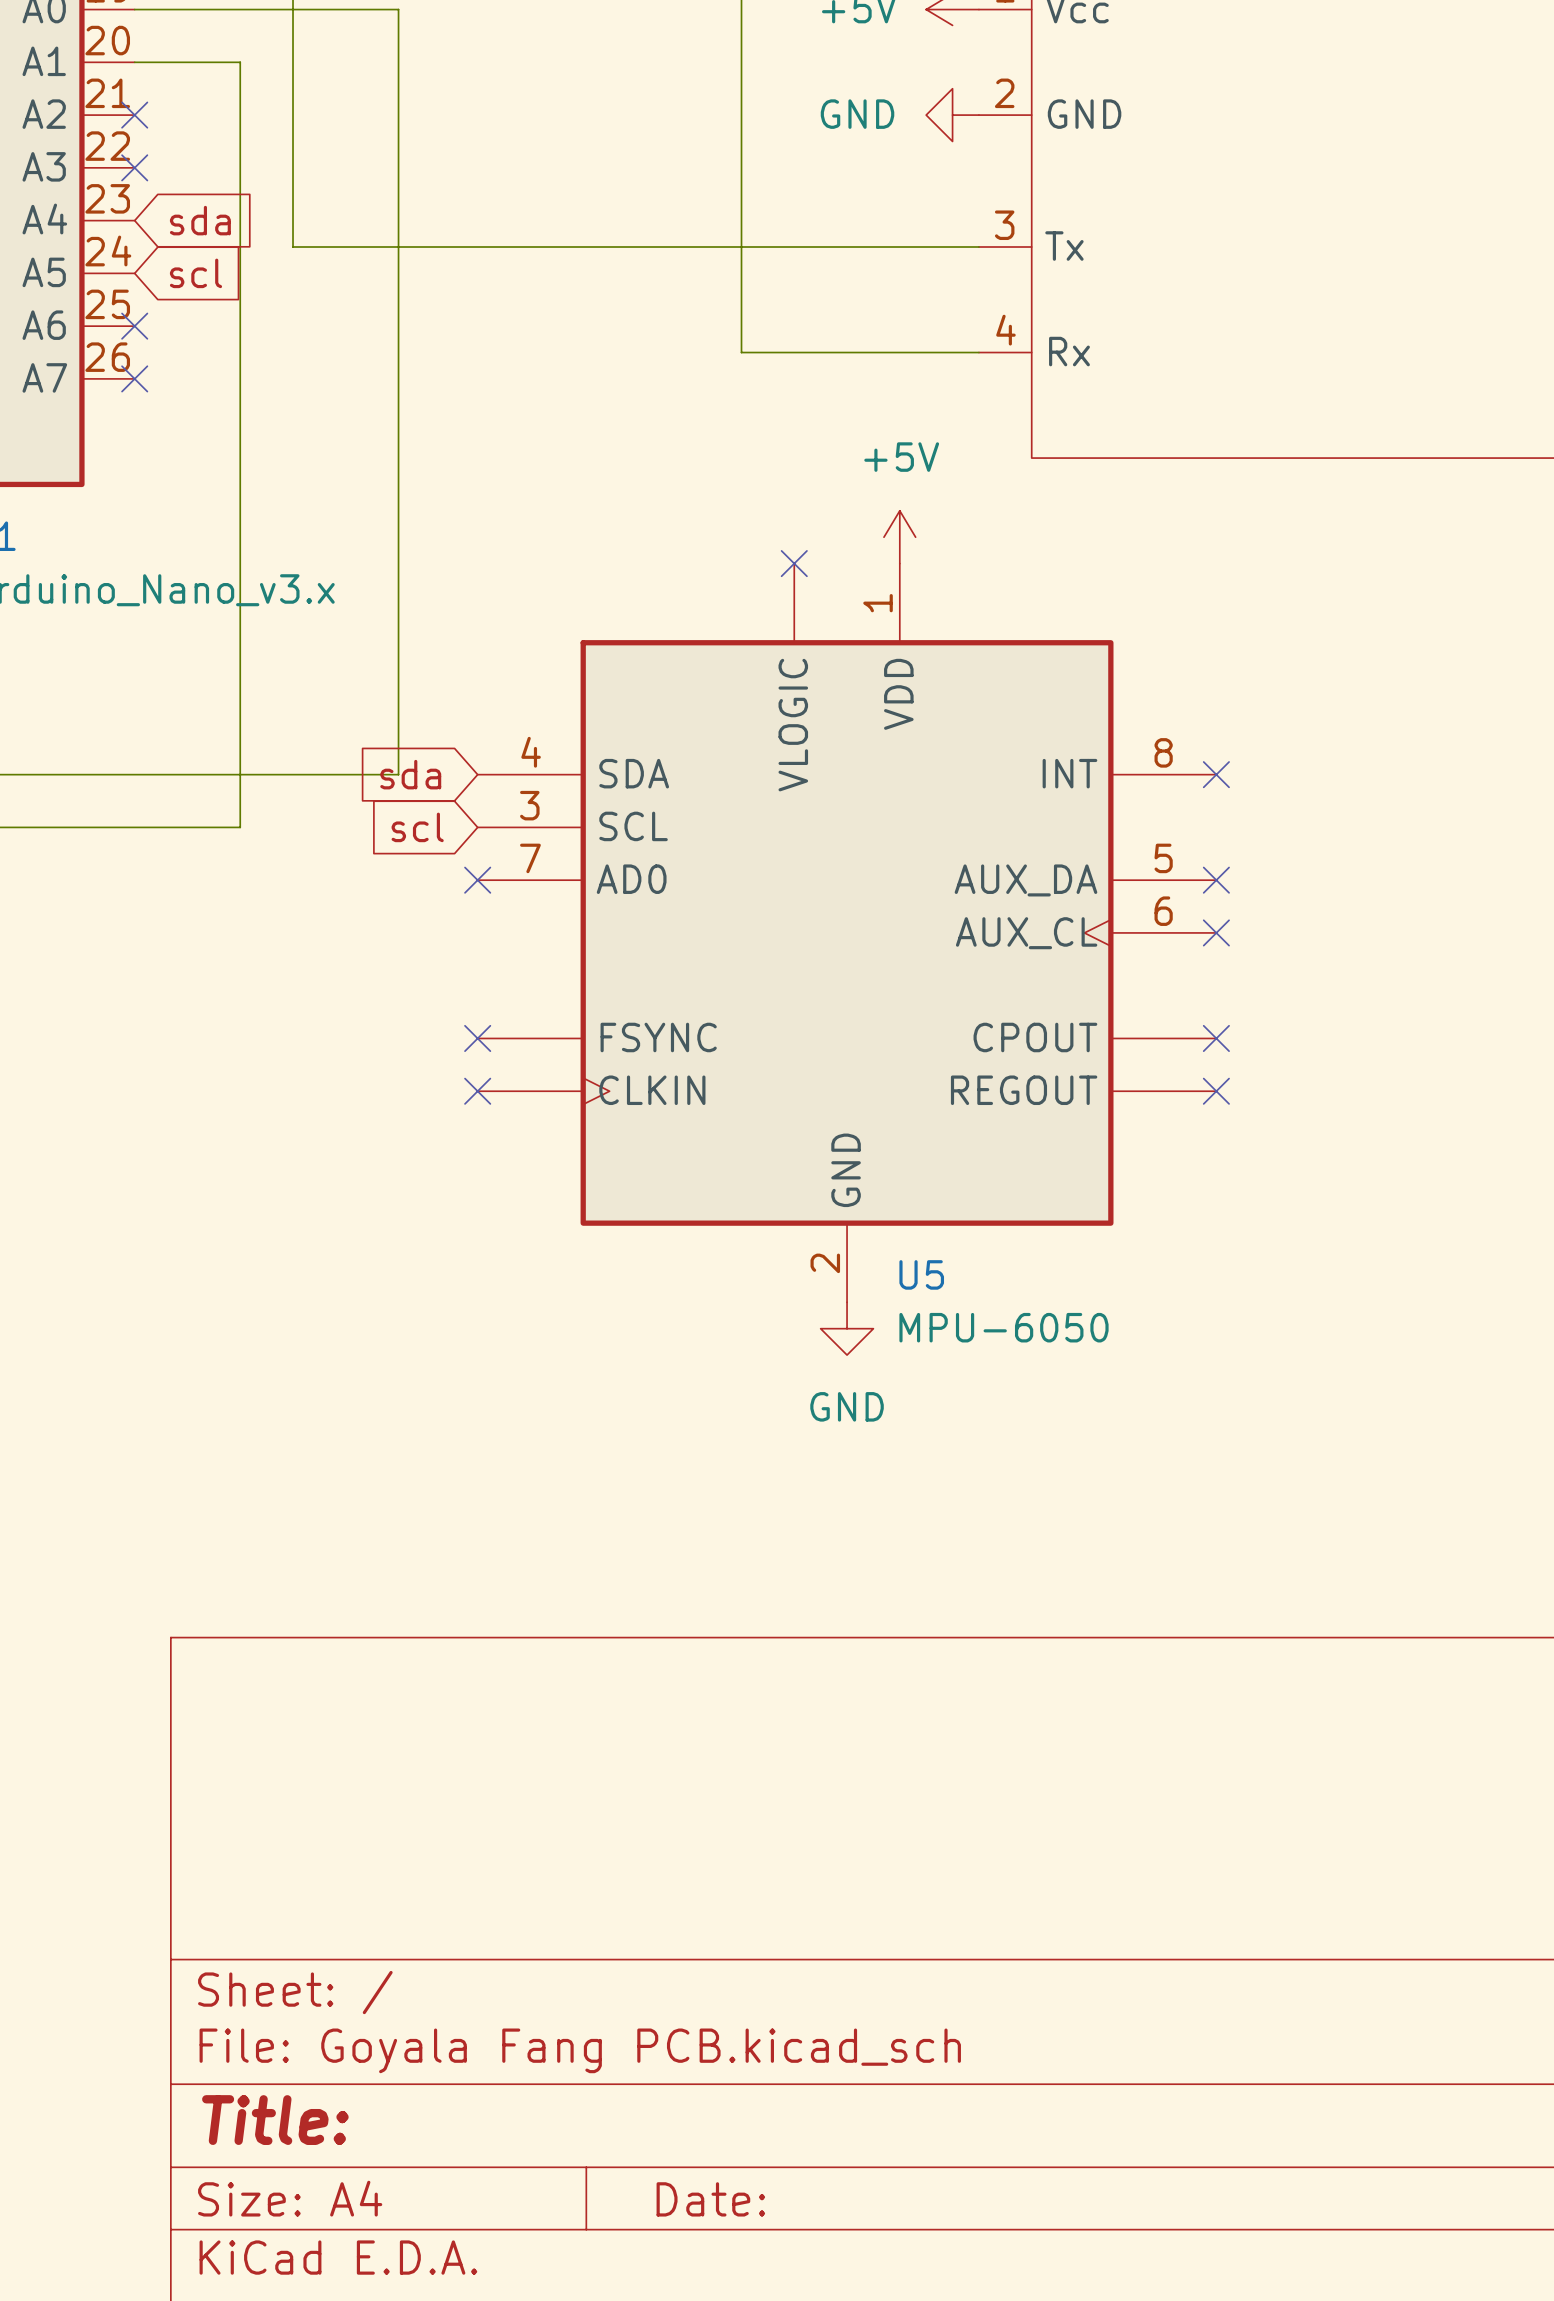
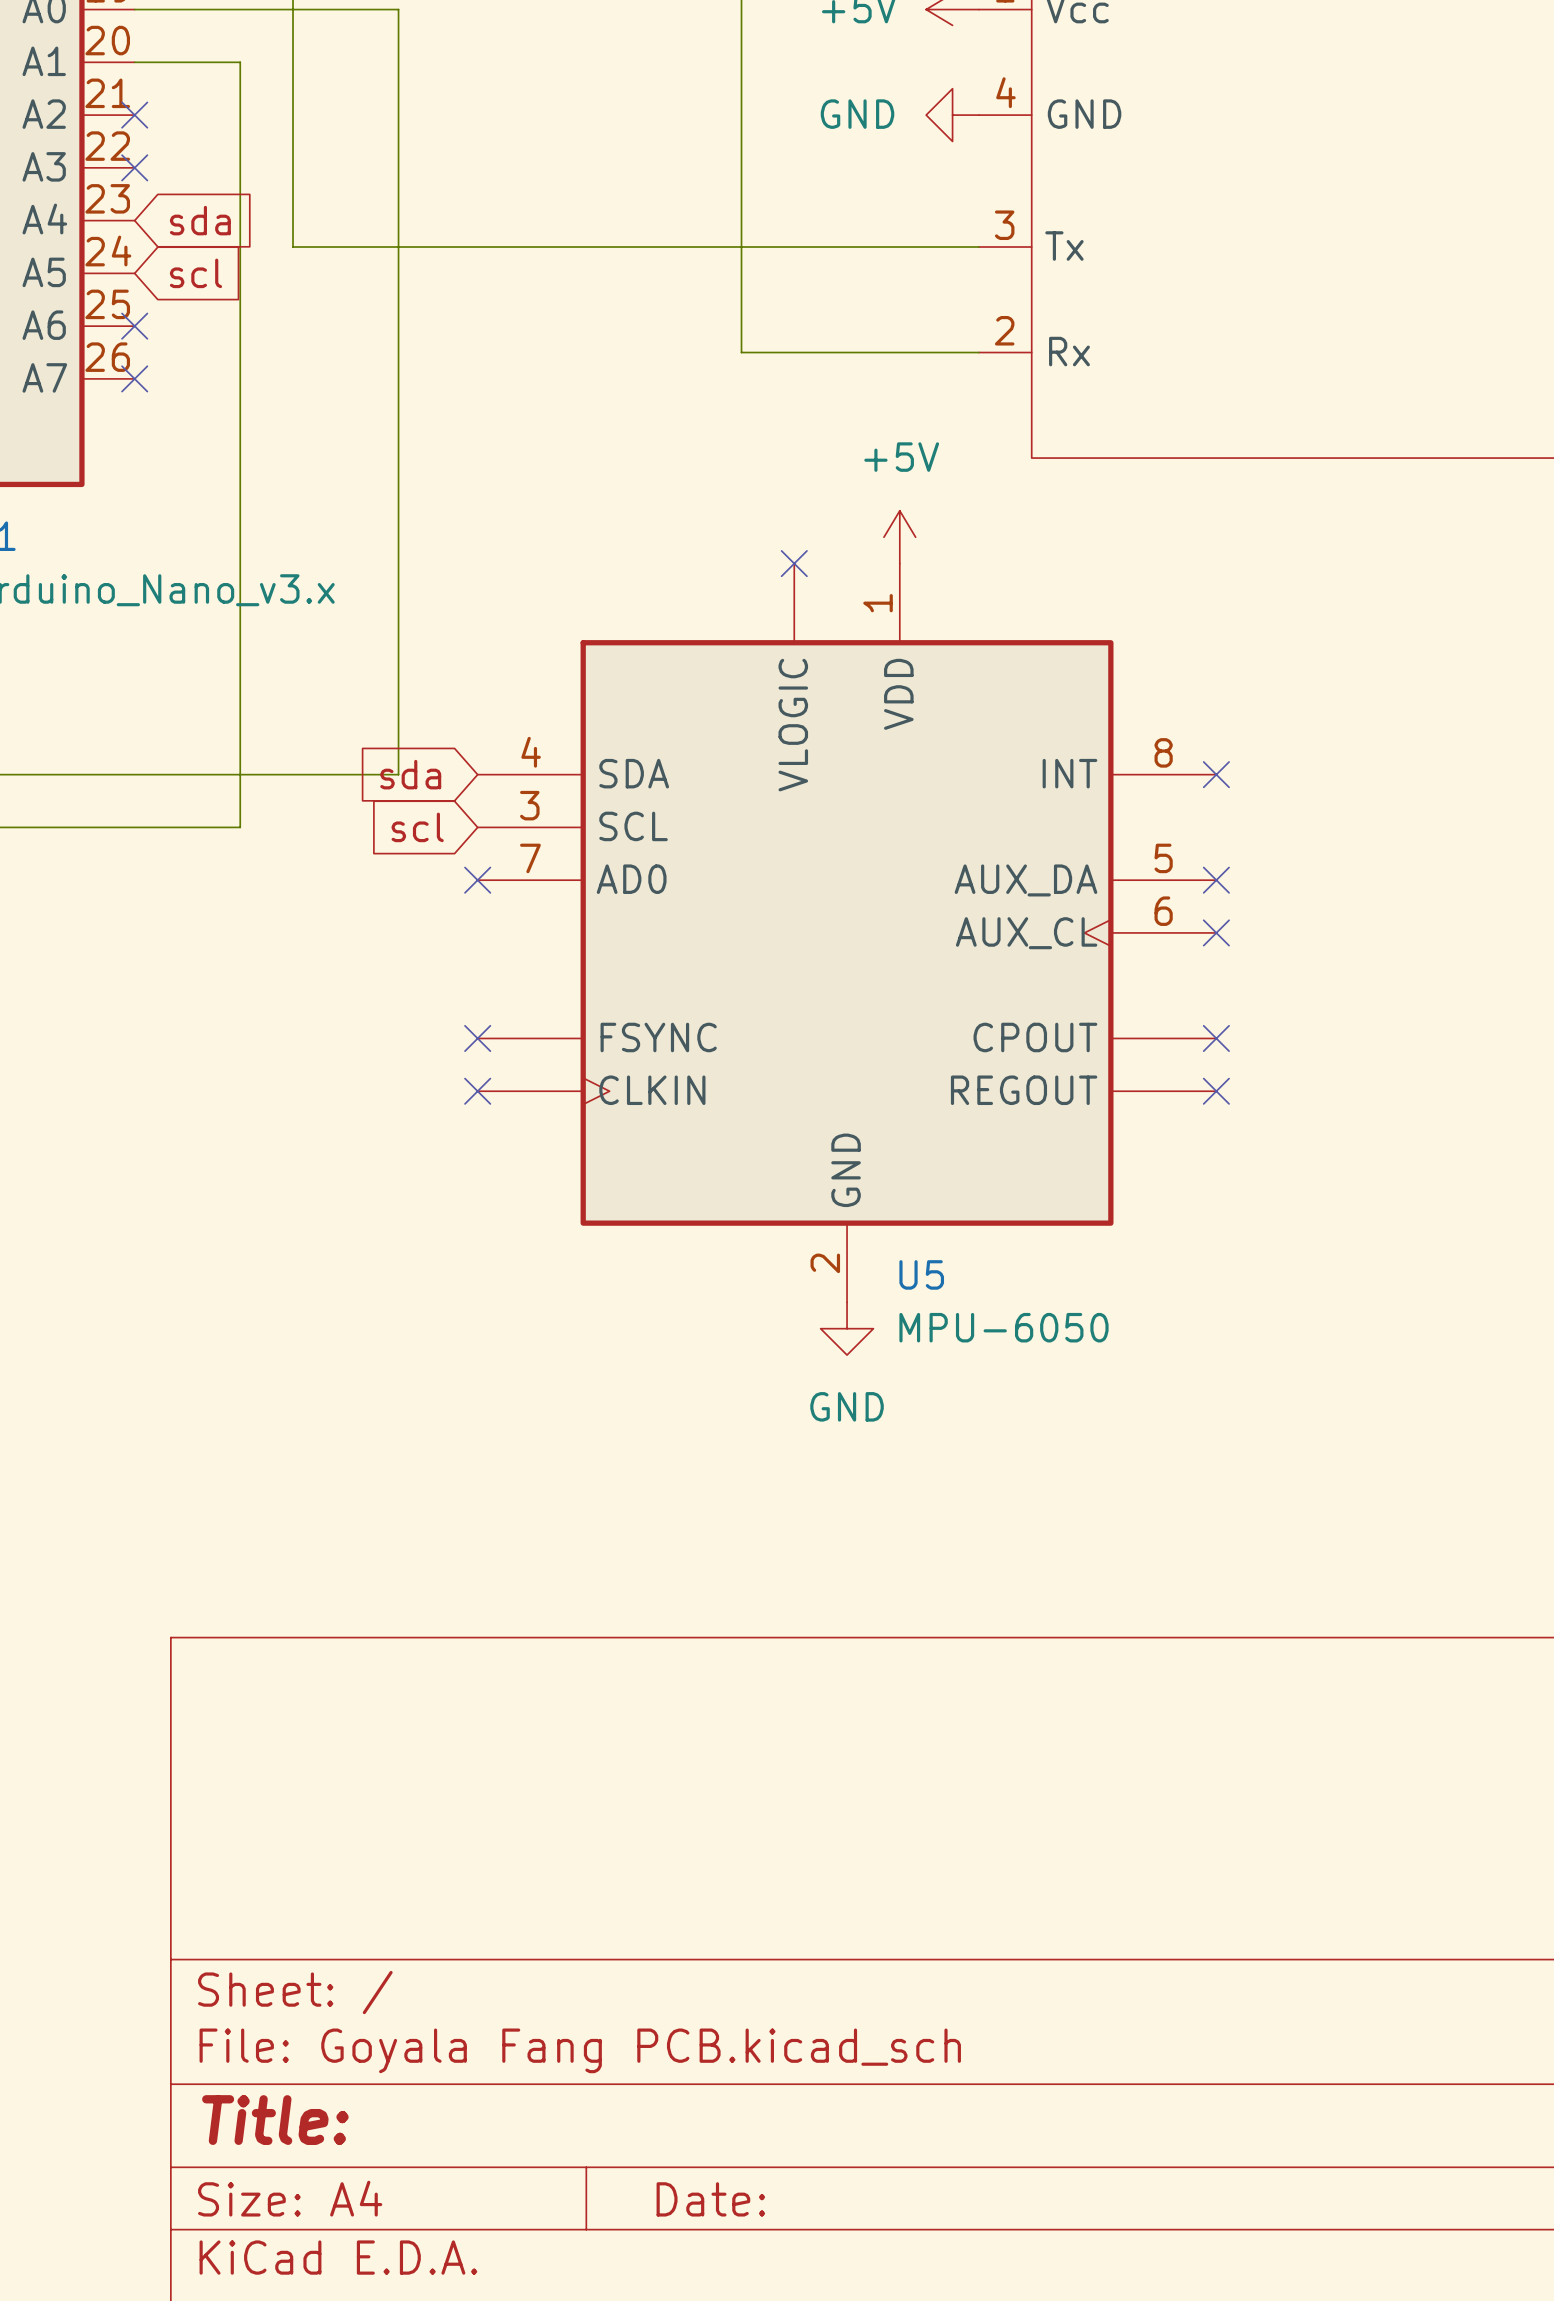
part pin number: 2 (1004, 93) -> 4 (1005, 92)
part pin number: 4 (1005, 330) -> 2 (1004, 330)

